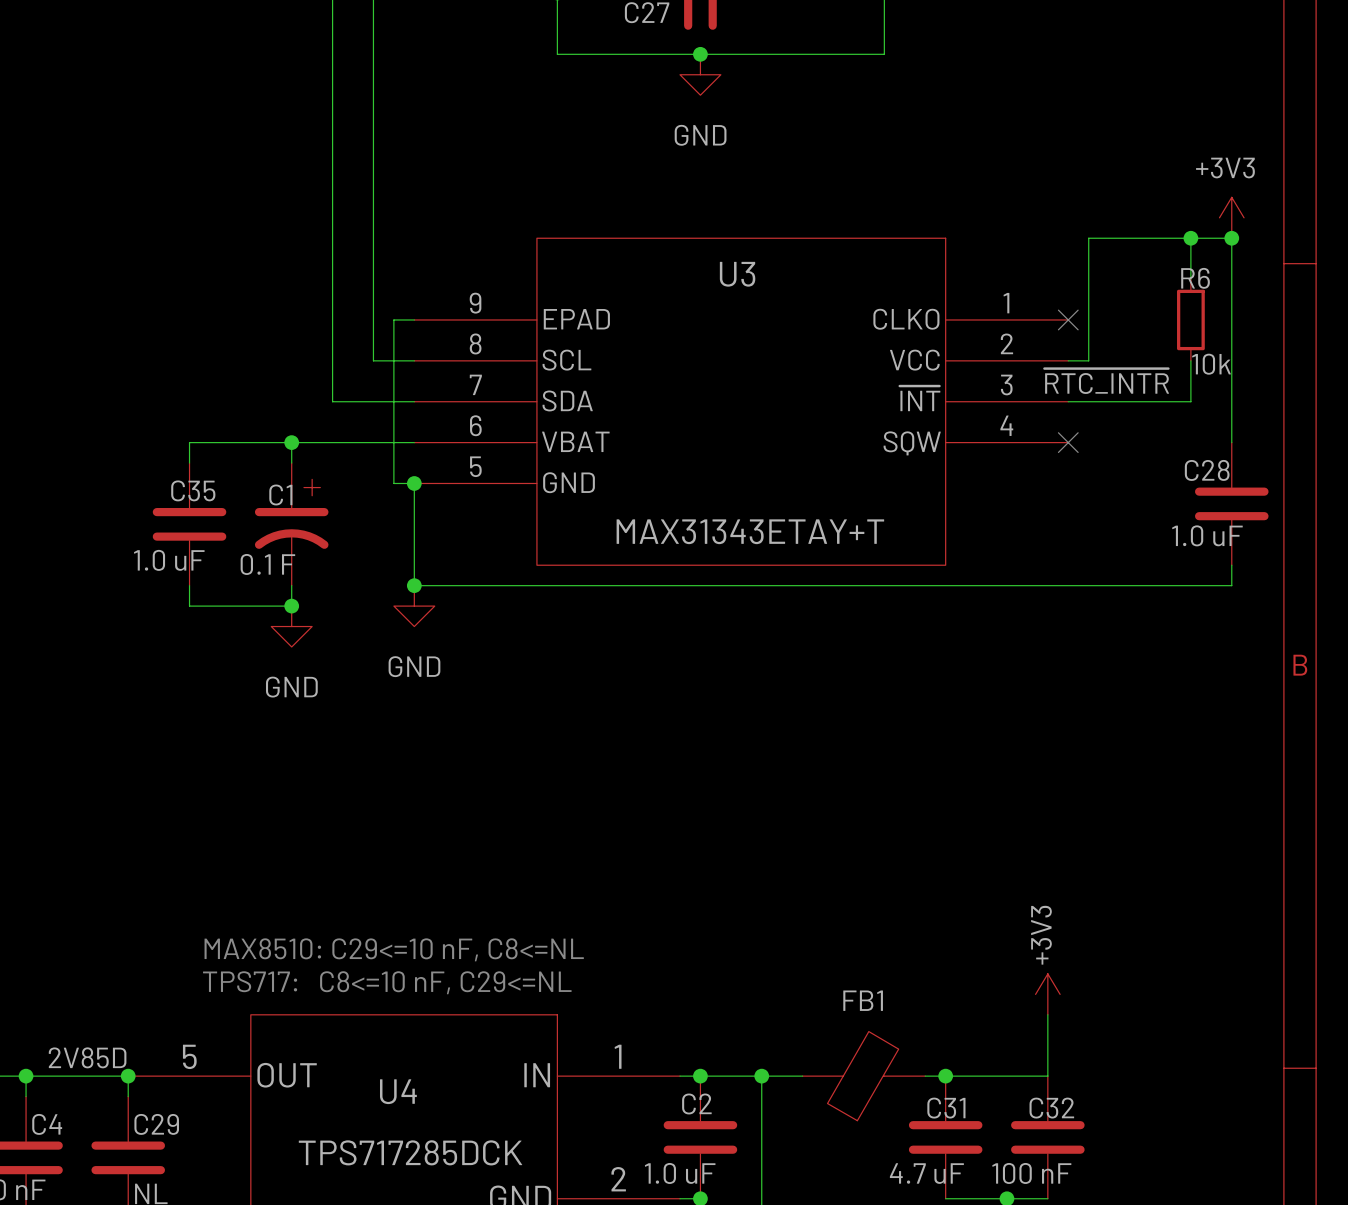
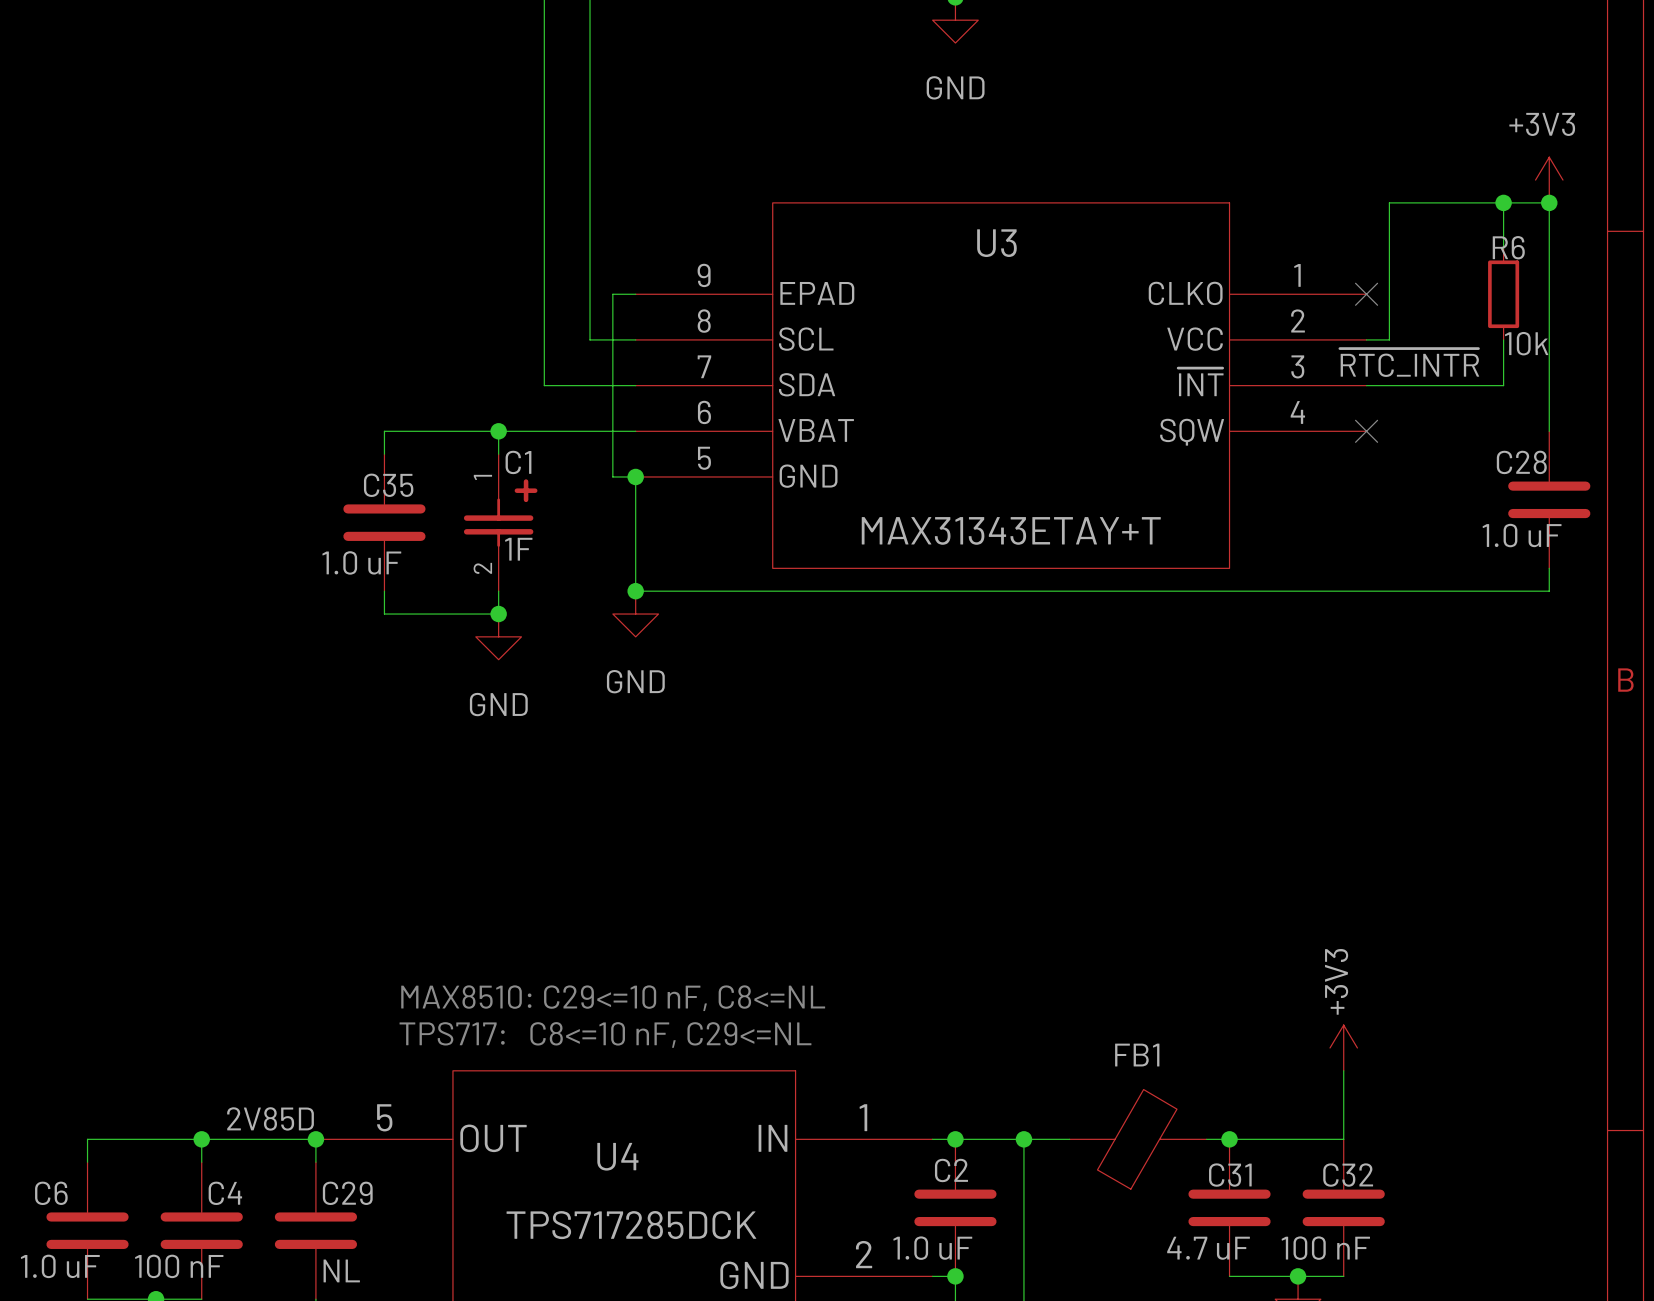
C1 symbol: [254, 463, 329, 586] -> [463, 454, 538, 592]
C1 name position: C1 (280, 494) -> C1 (518, 462)
C1 value: 0.1 F (267, 564) -> 1F (518, 549)

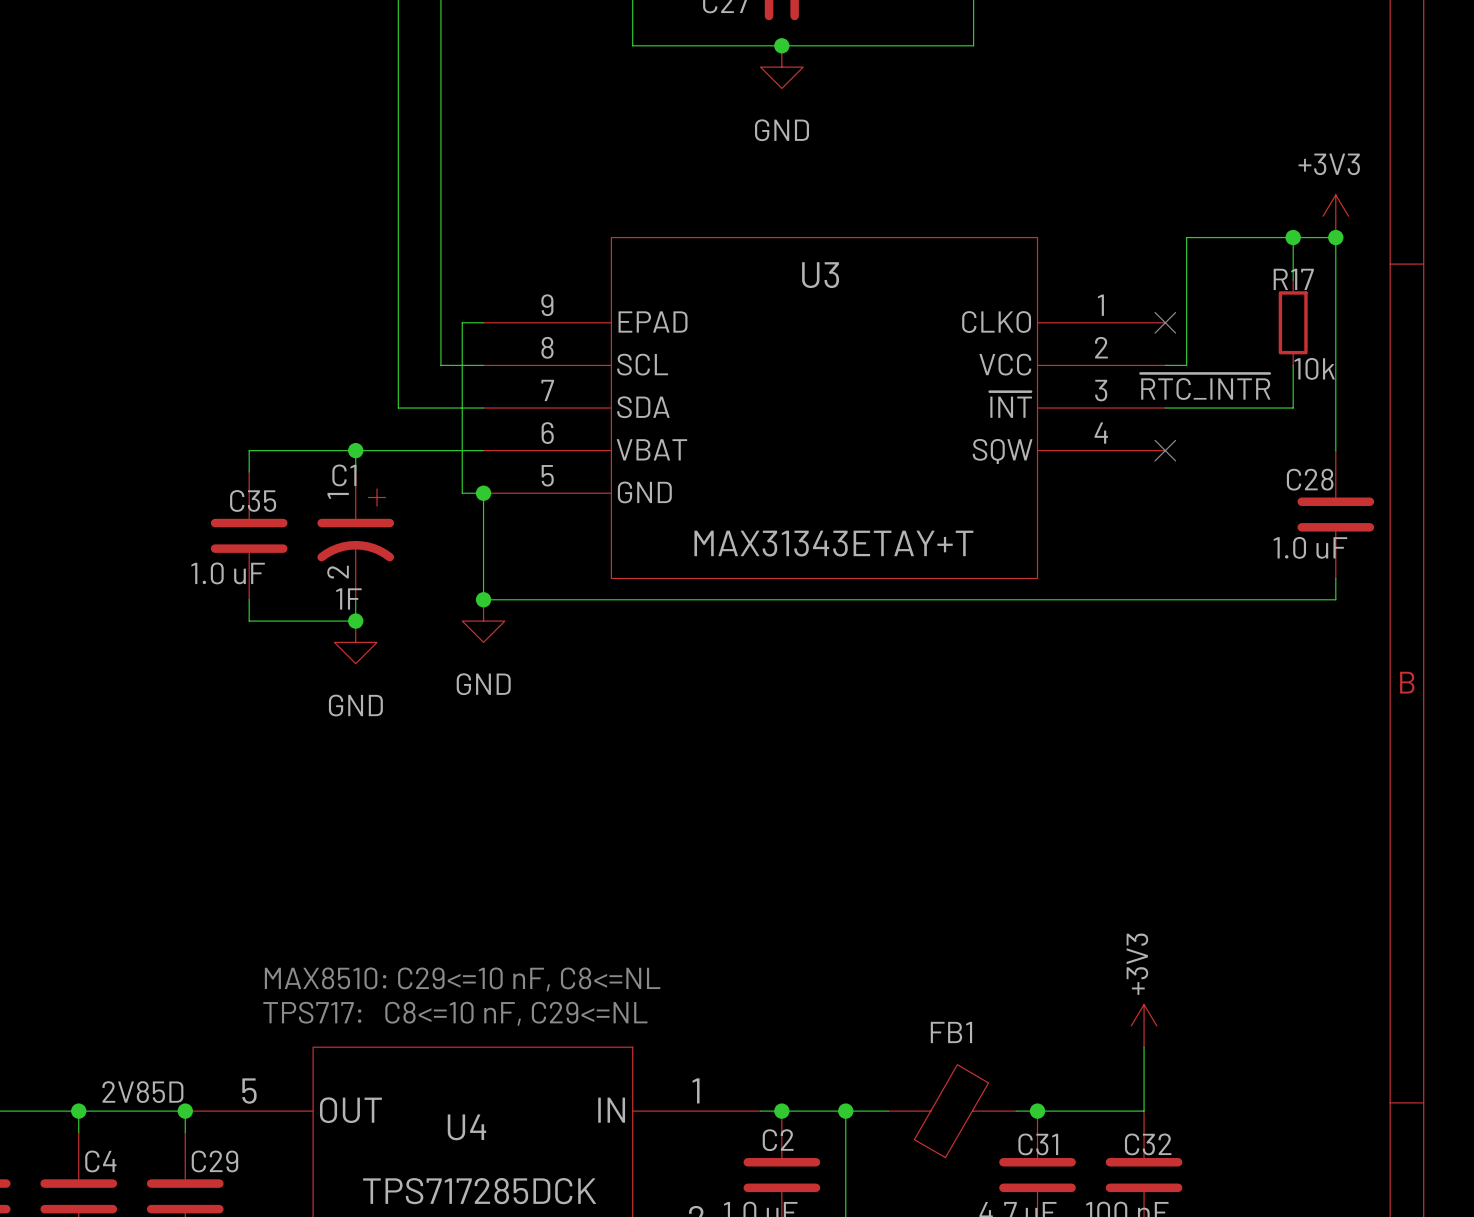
R6 name: R6 (1508, 247) -> R17 (1293, 279)
C1 symbol: [463, 454, 538, 592] -> [317, 471, 395, 600]
C1 value position: 1F (518, 549) -> 1F (348, 598)

